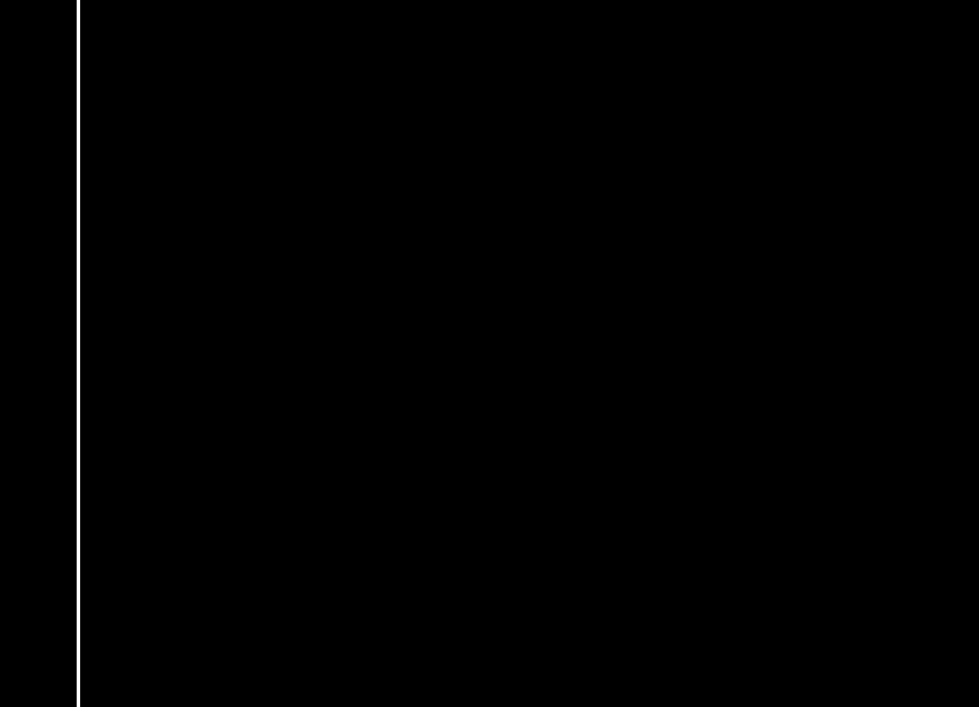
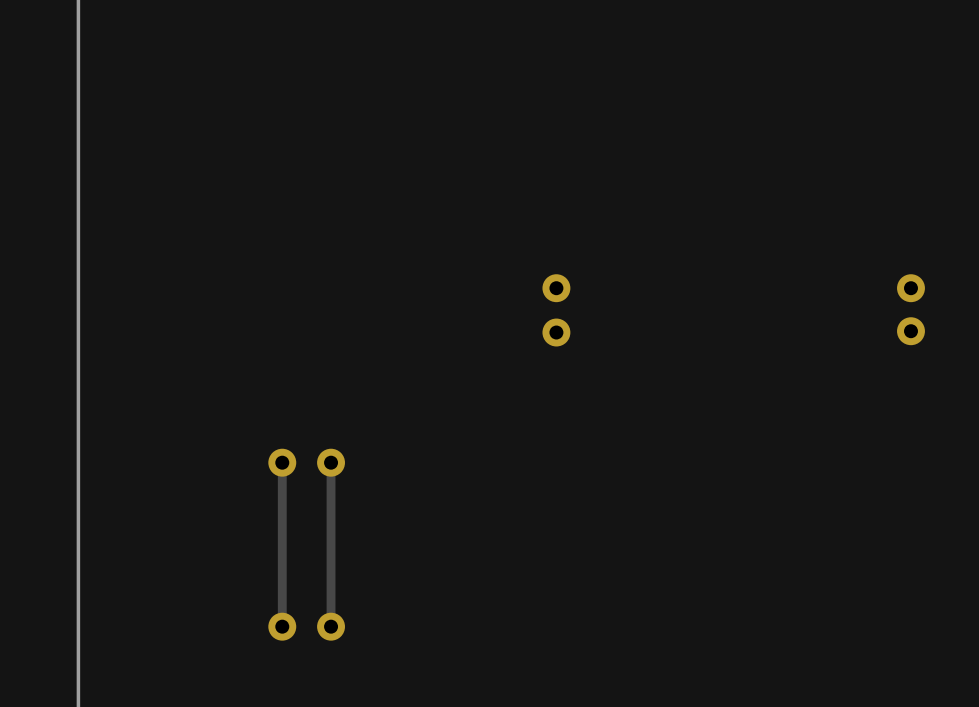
via: none -> (556, 288)
via: none -> (910, 288)
via: none -> (910, 331)
via: none -> (556, 332)
track: none -> (282, 462) (282, 626)
via: none -> (282, 462)
track: none -> (331, 462) (331, 626)
via: none -> (331, 462)
via: none -> (282, 626)
via: none -> (331, 626)

